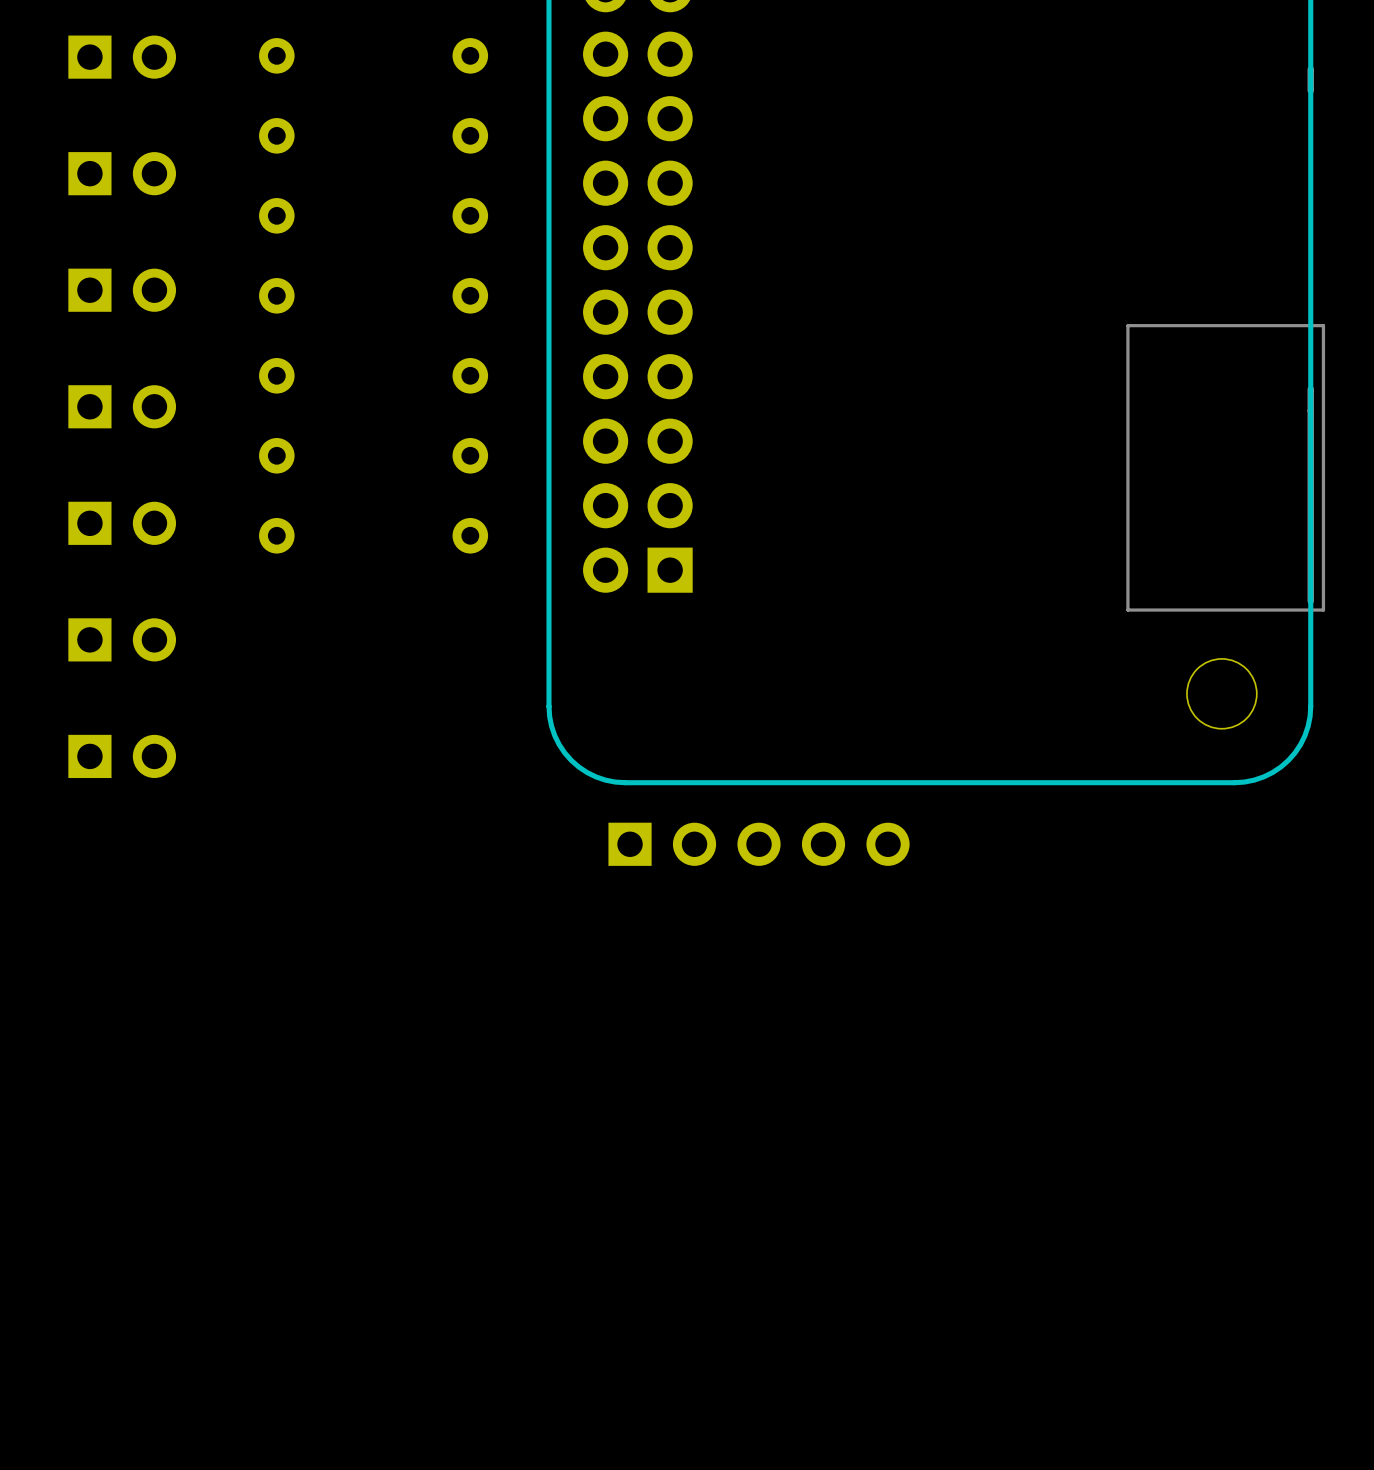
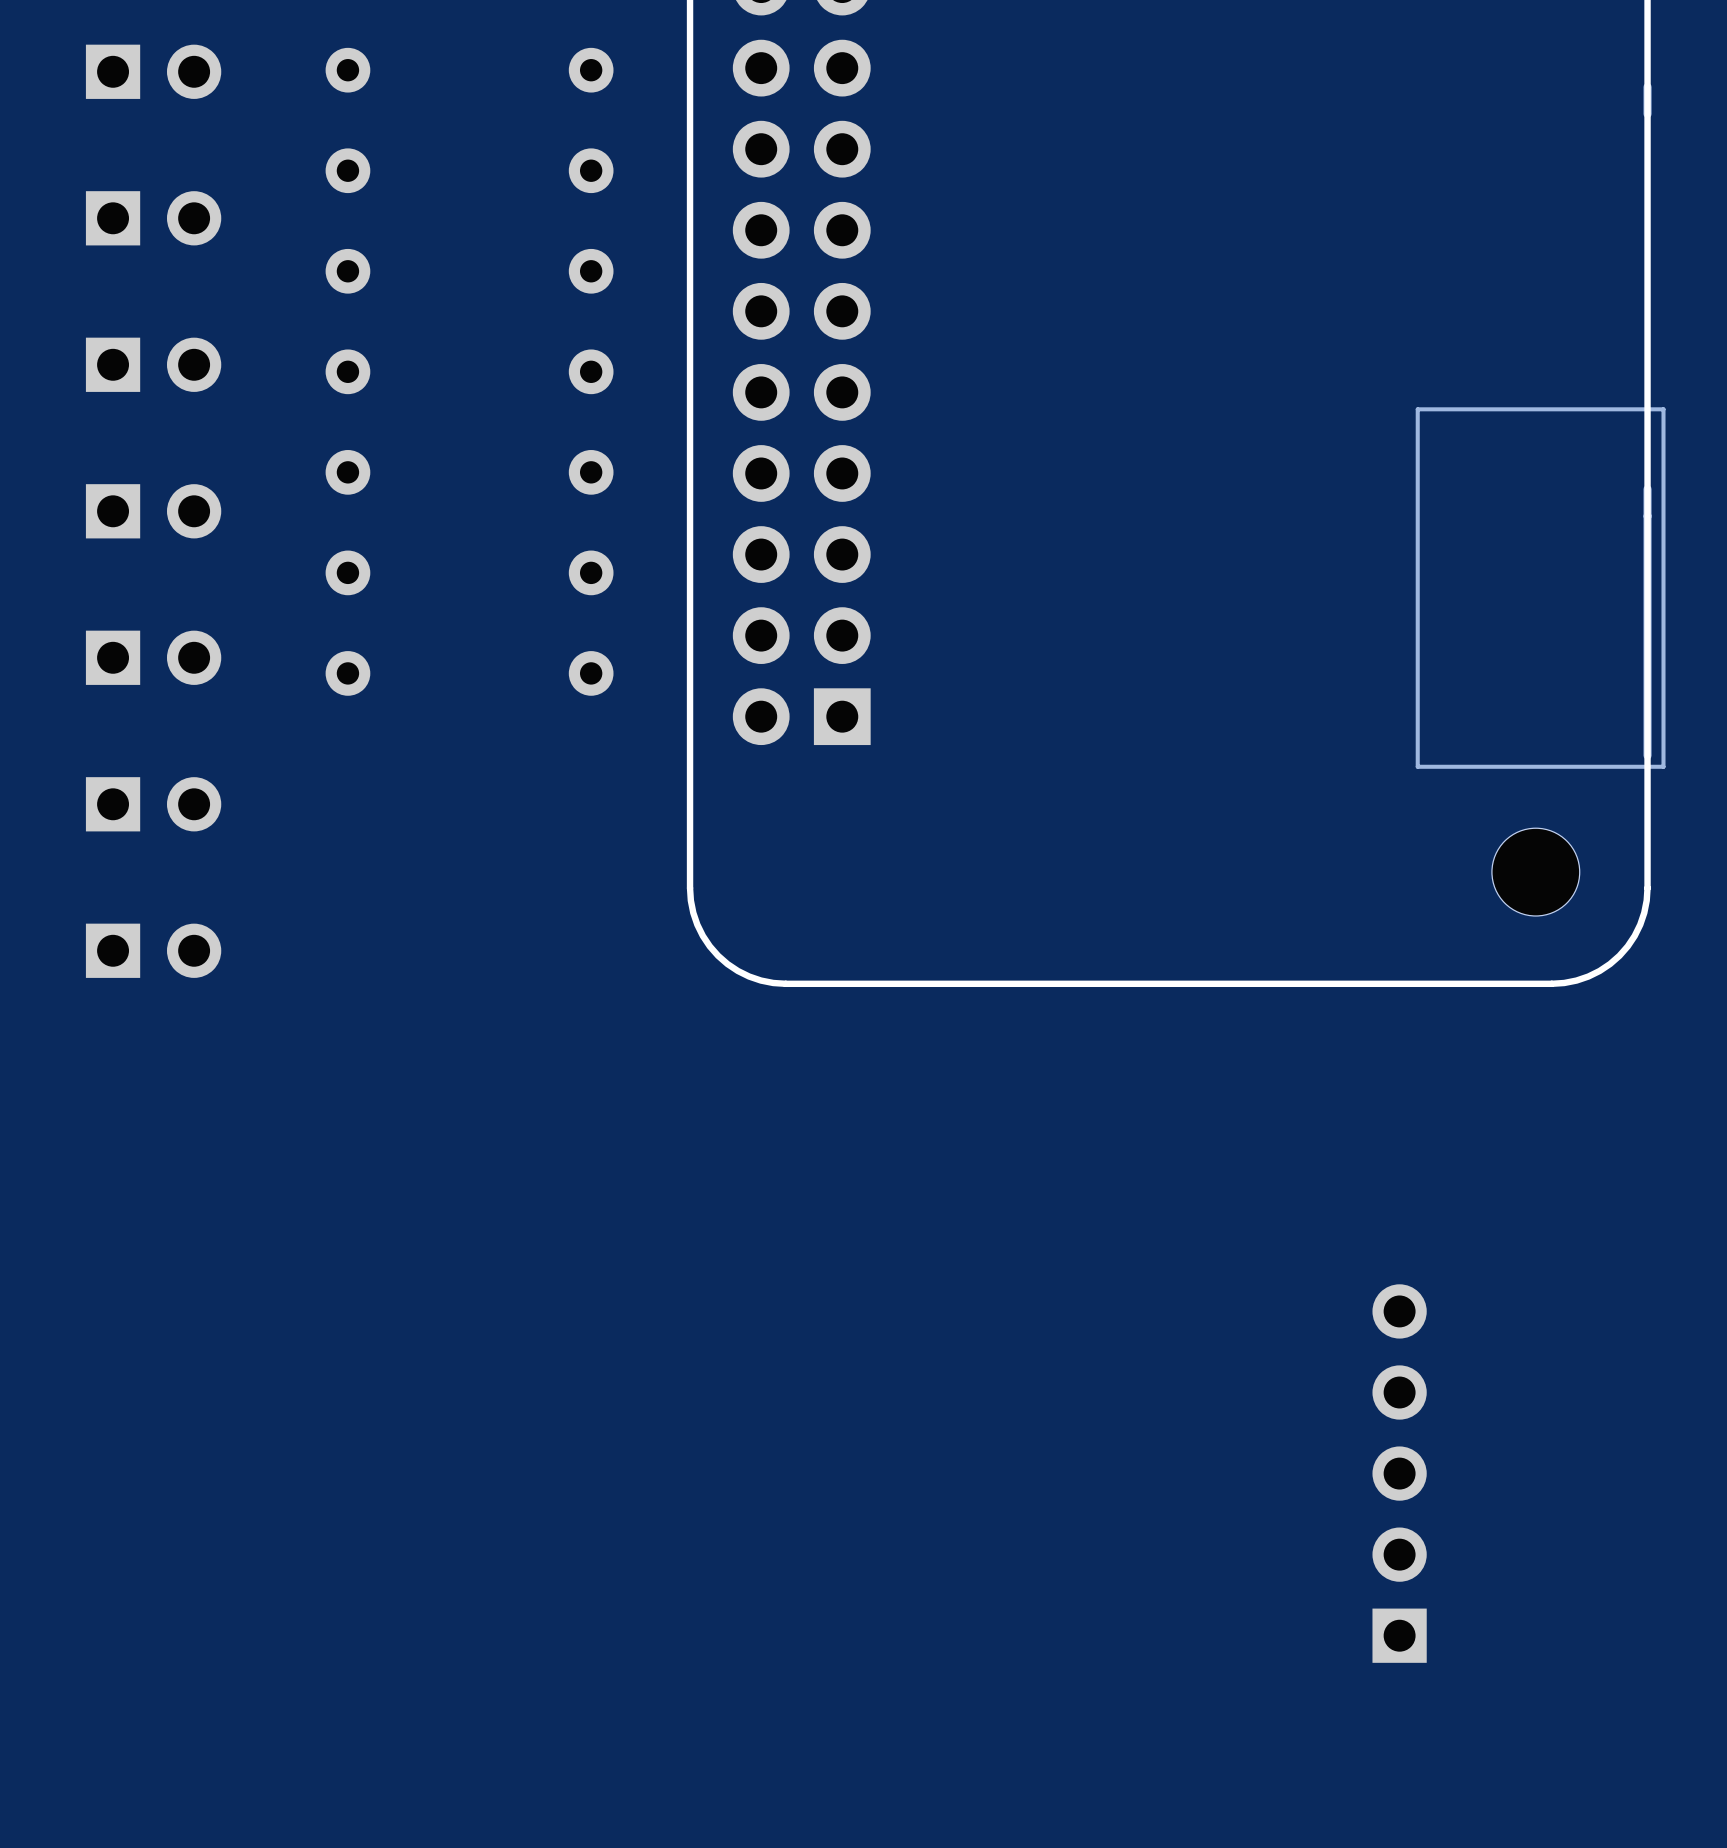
part rotation: 0° (759, 844) -> 90° counterclockwise (1399, 1473)
part position: (759, 844) -> (1399, 1473)

